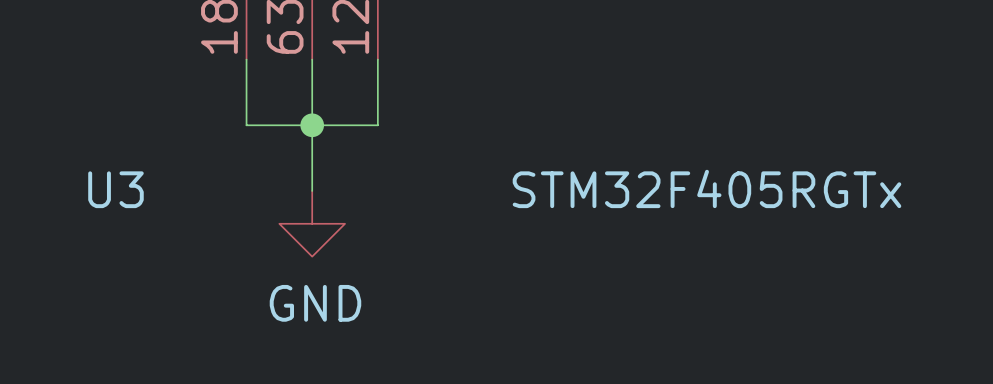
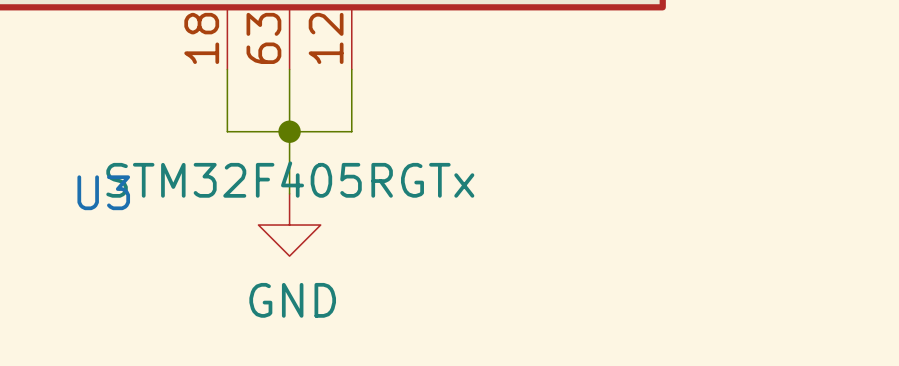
U3 value position: STM32F405RGTx (706, 188) -> STM32F405RGTx (290, 179)

